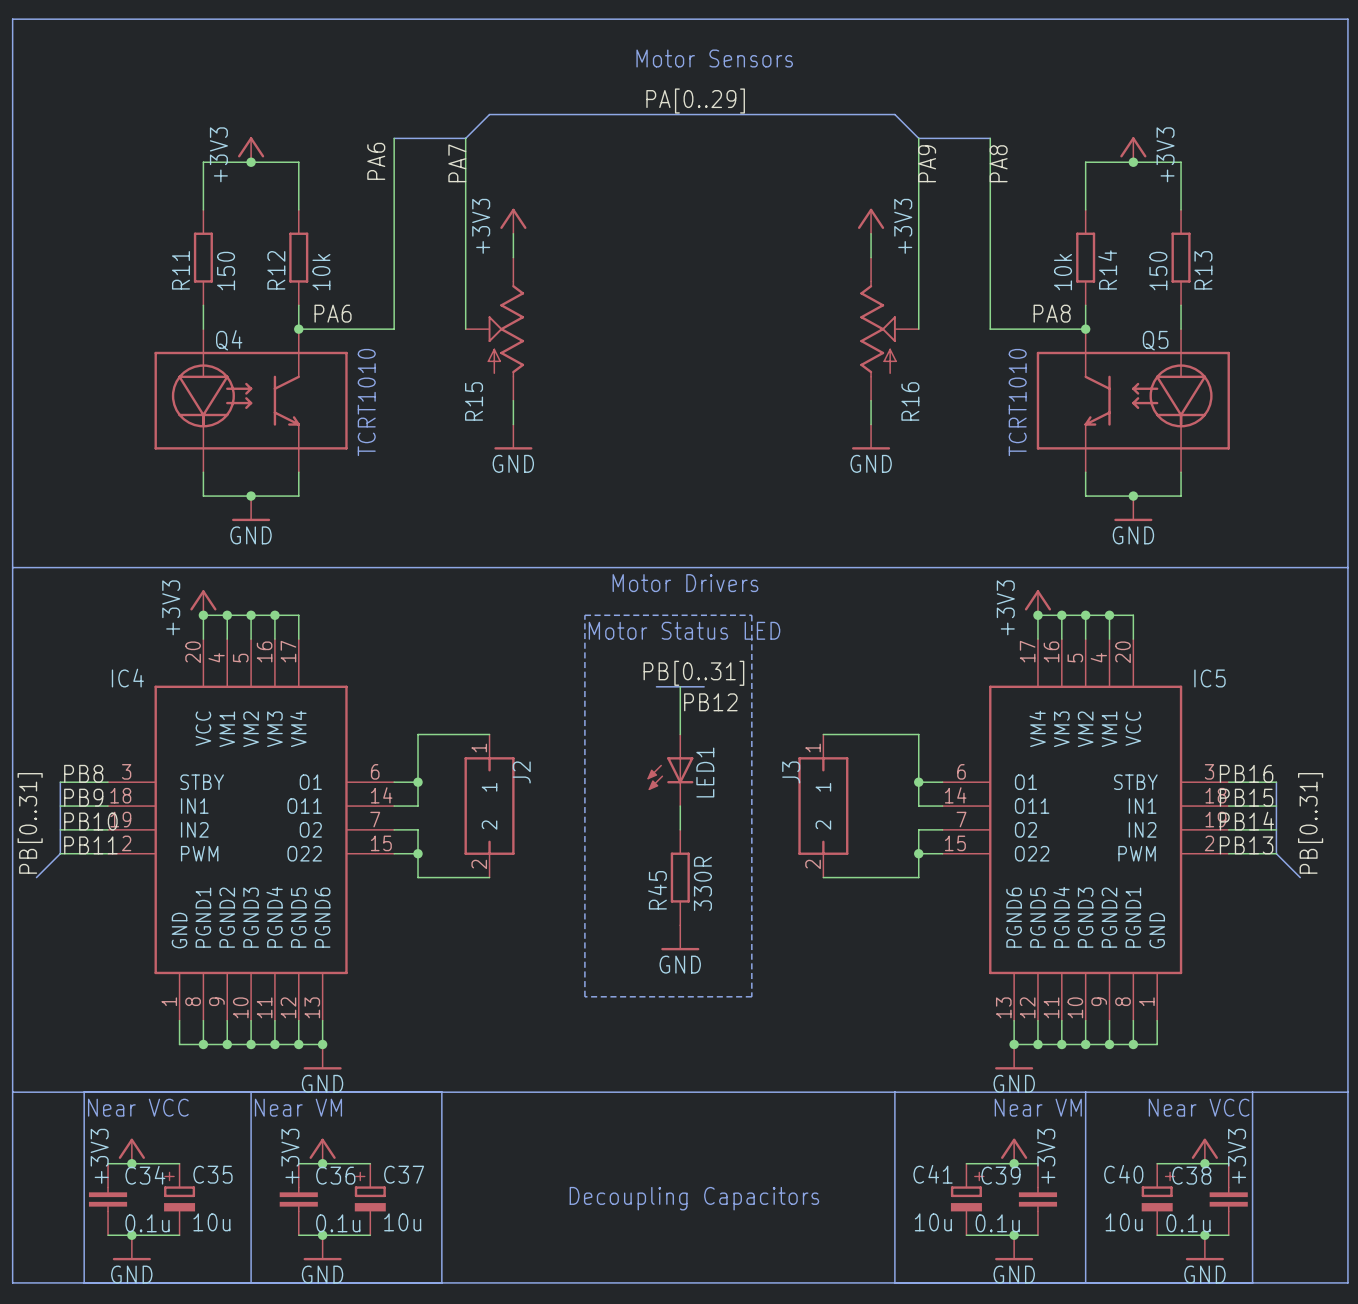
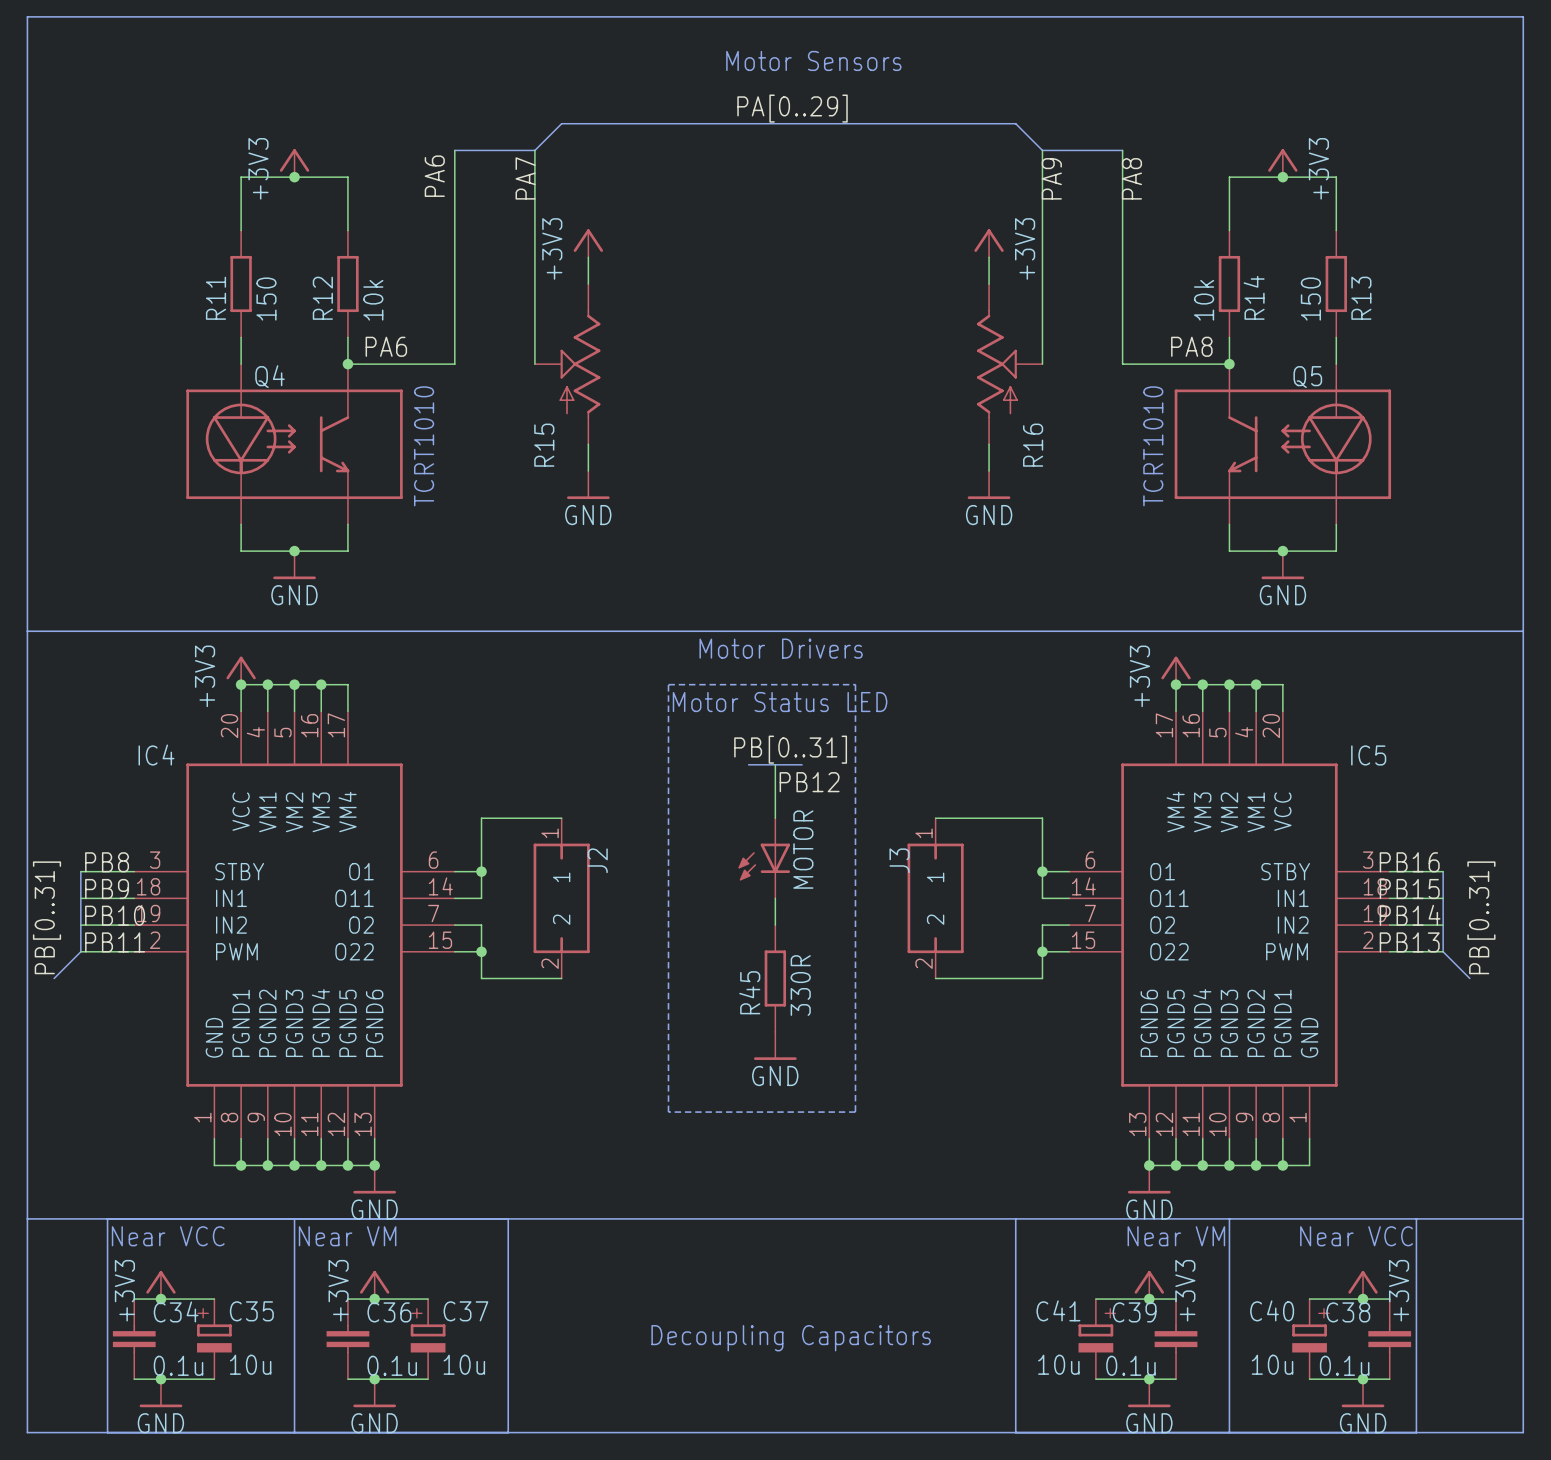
LED1 name: LED1 (705, 772) -> MOTOR (803, 849)

